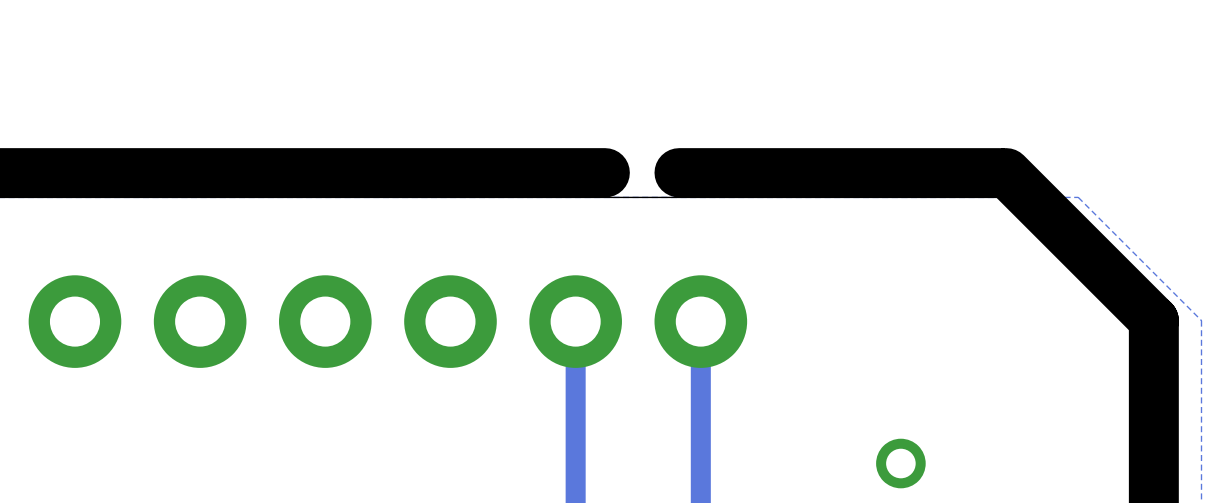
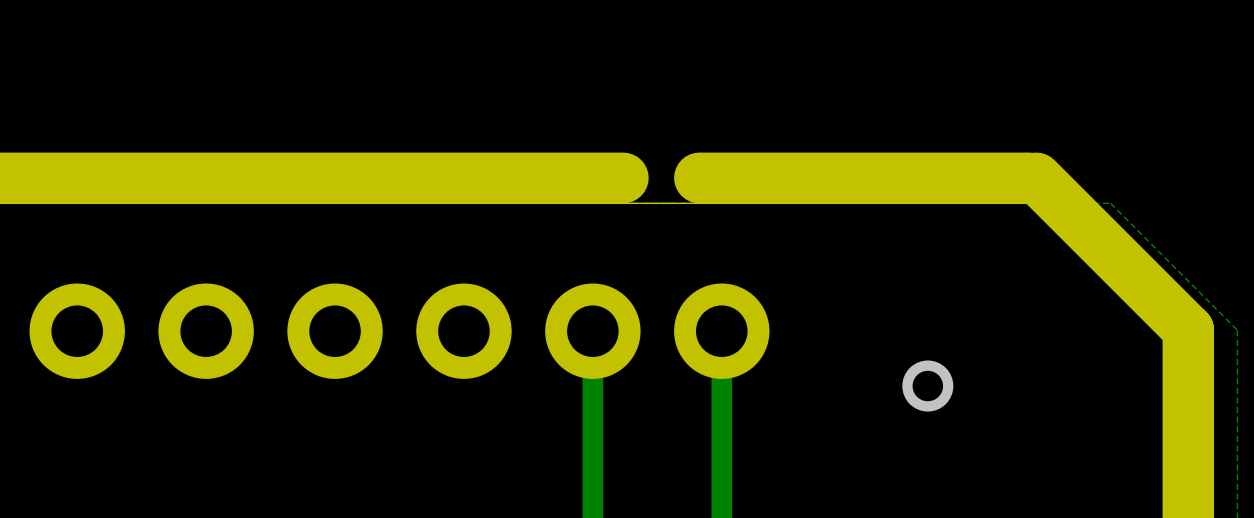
via position: (900, 463) -> (927, 386)

